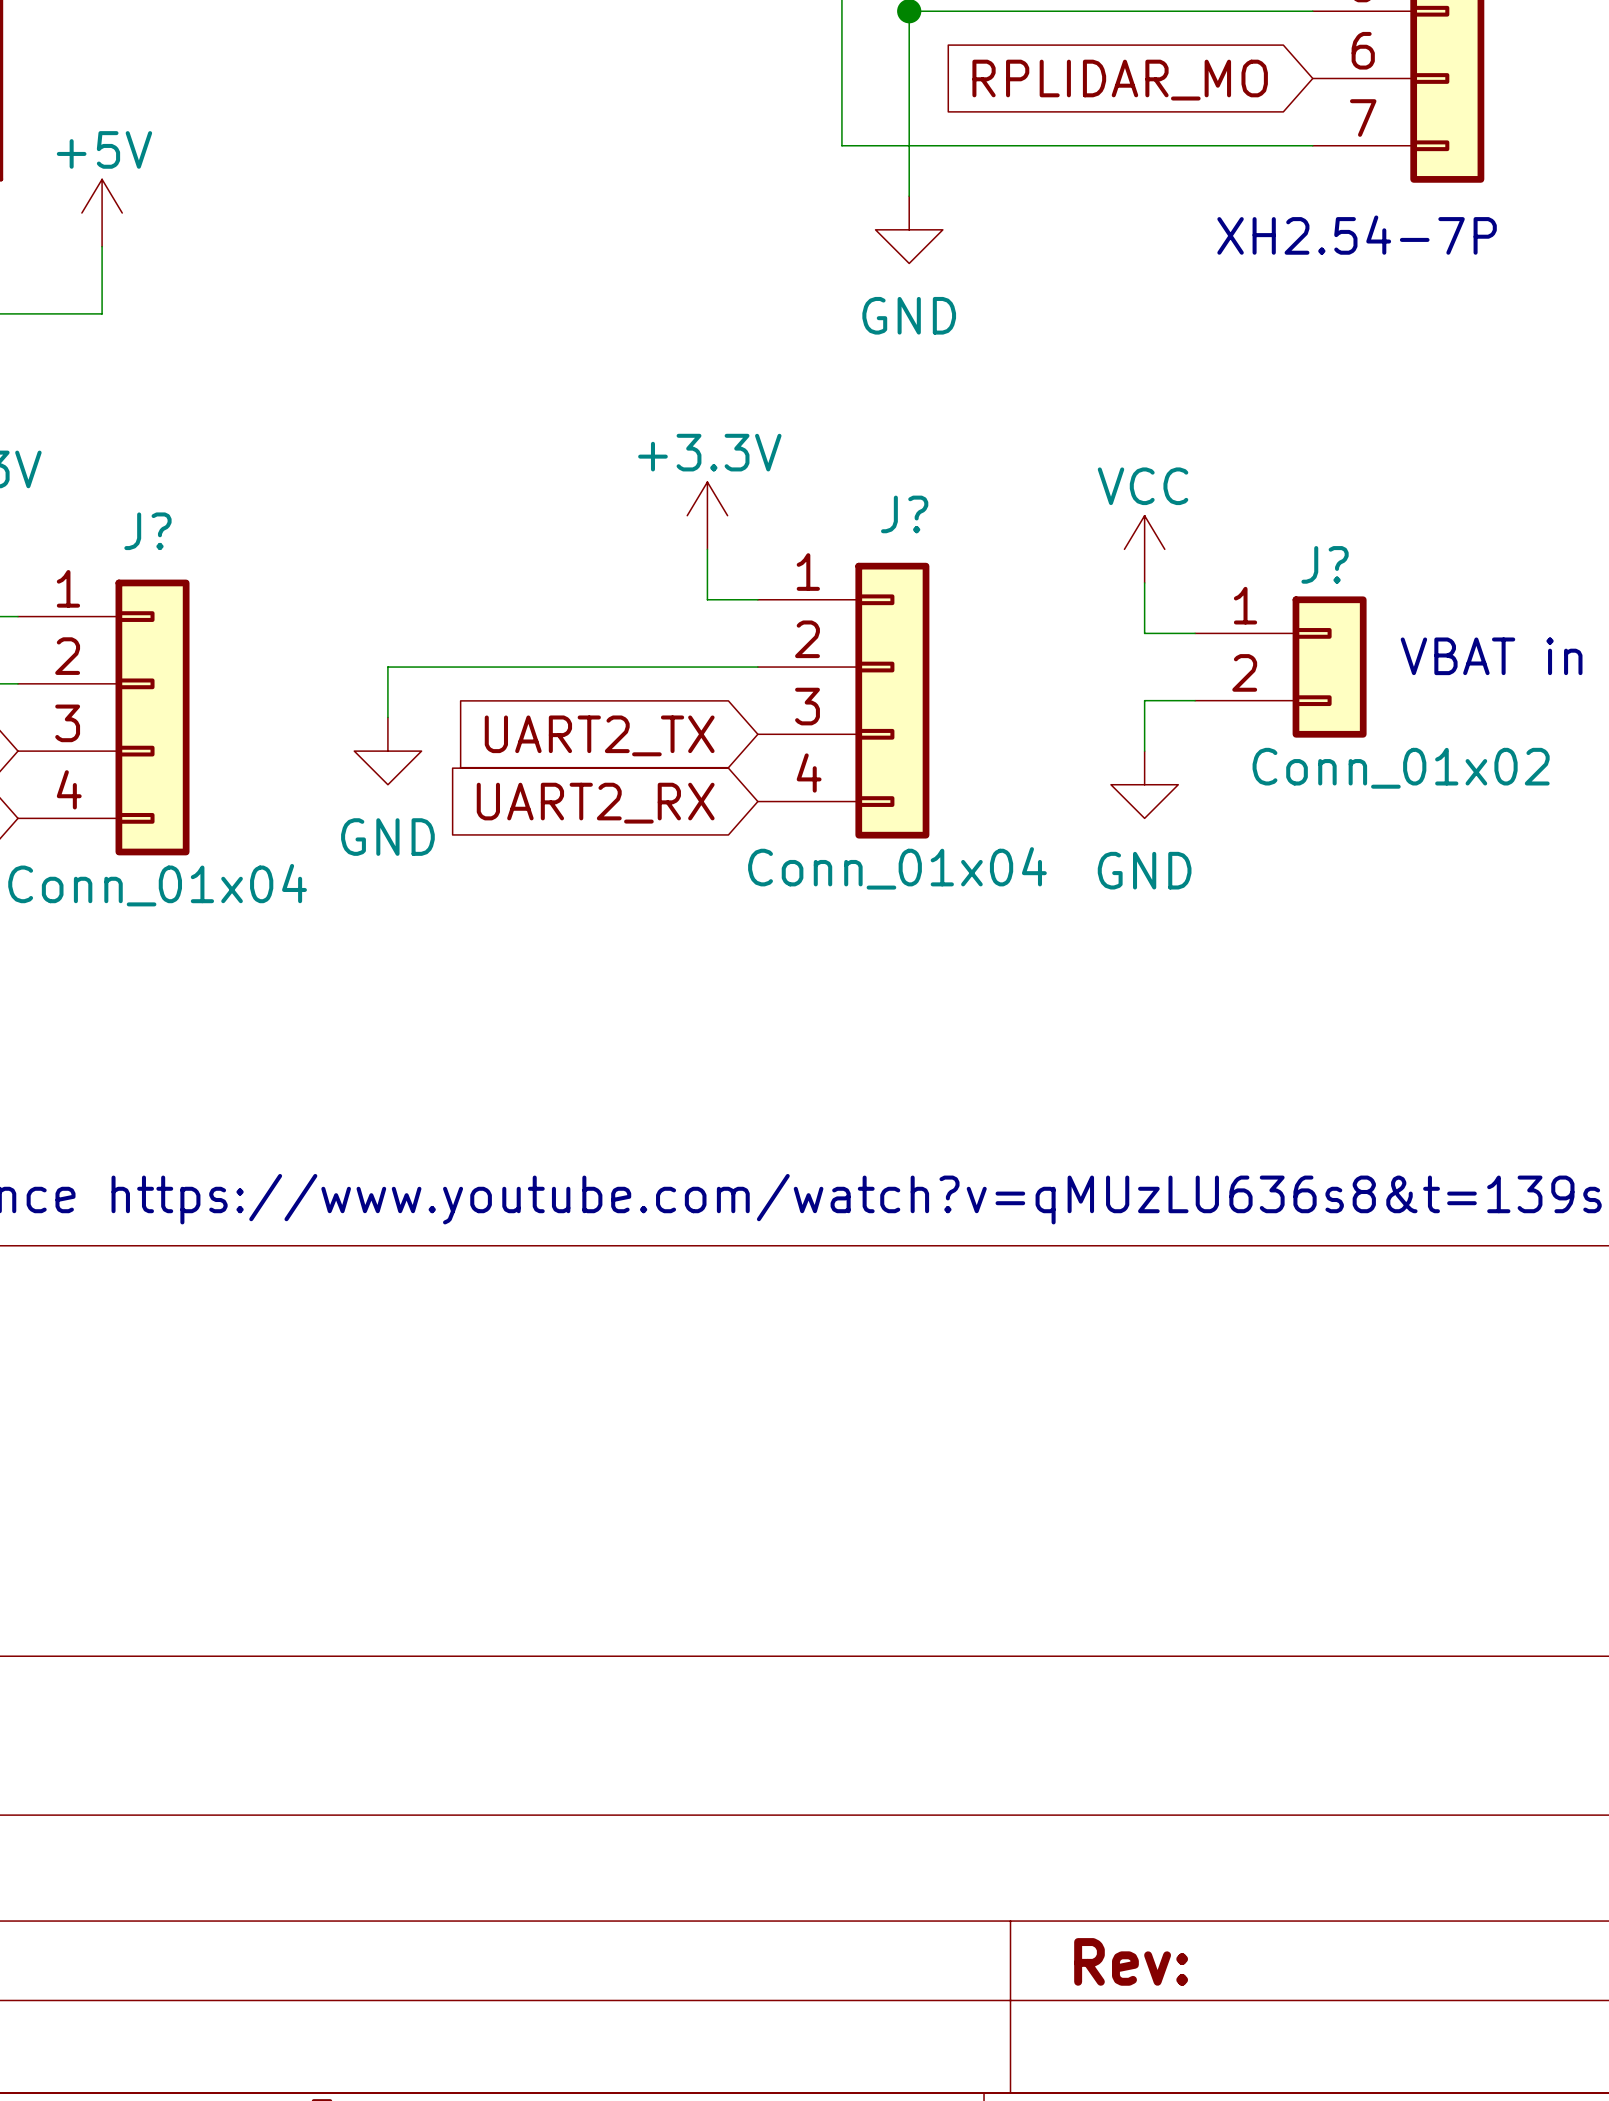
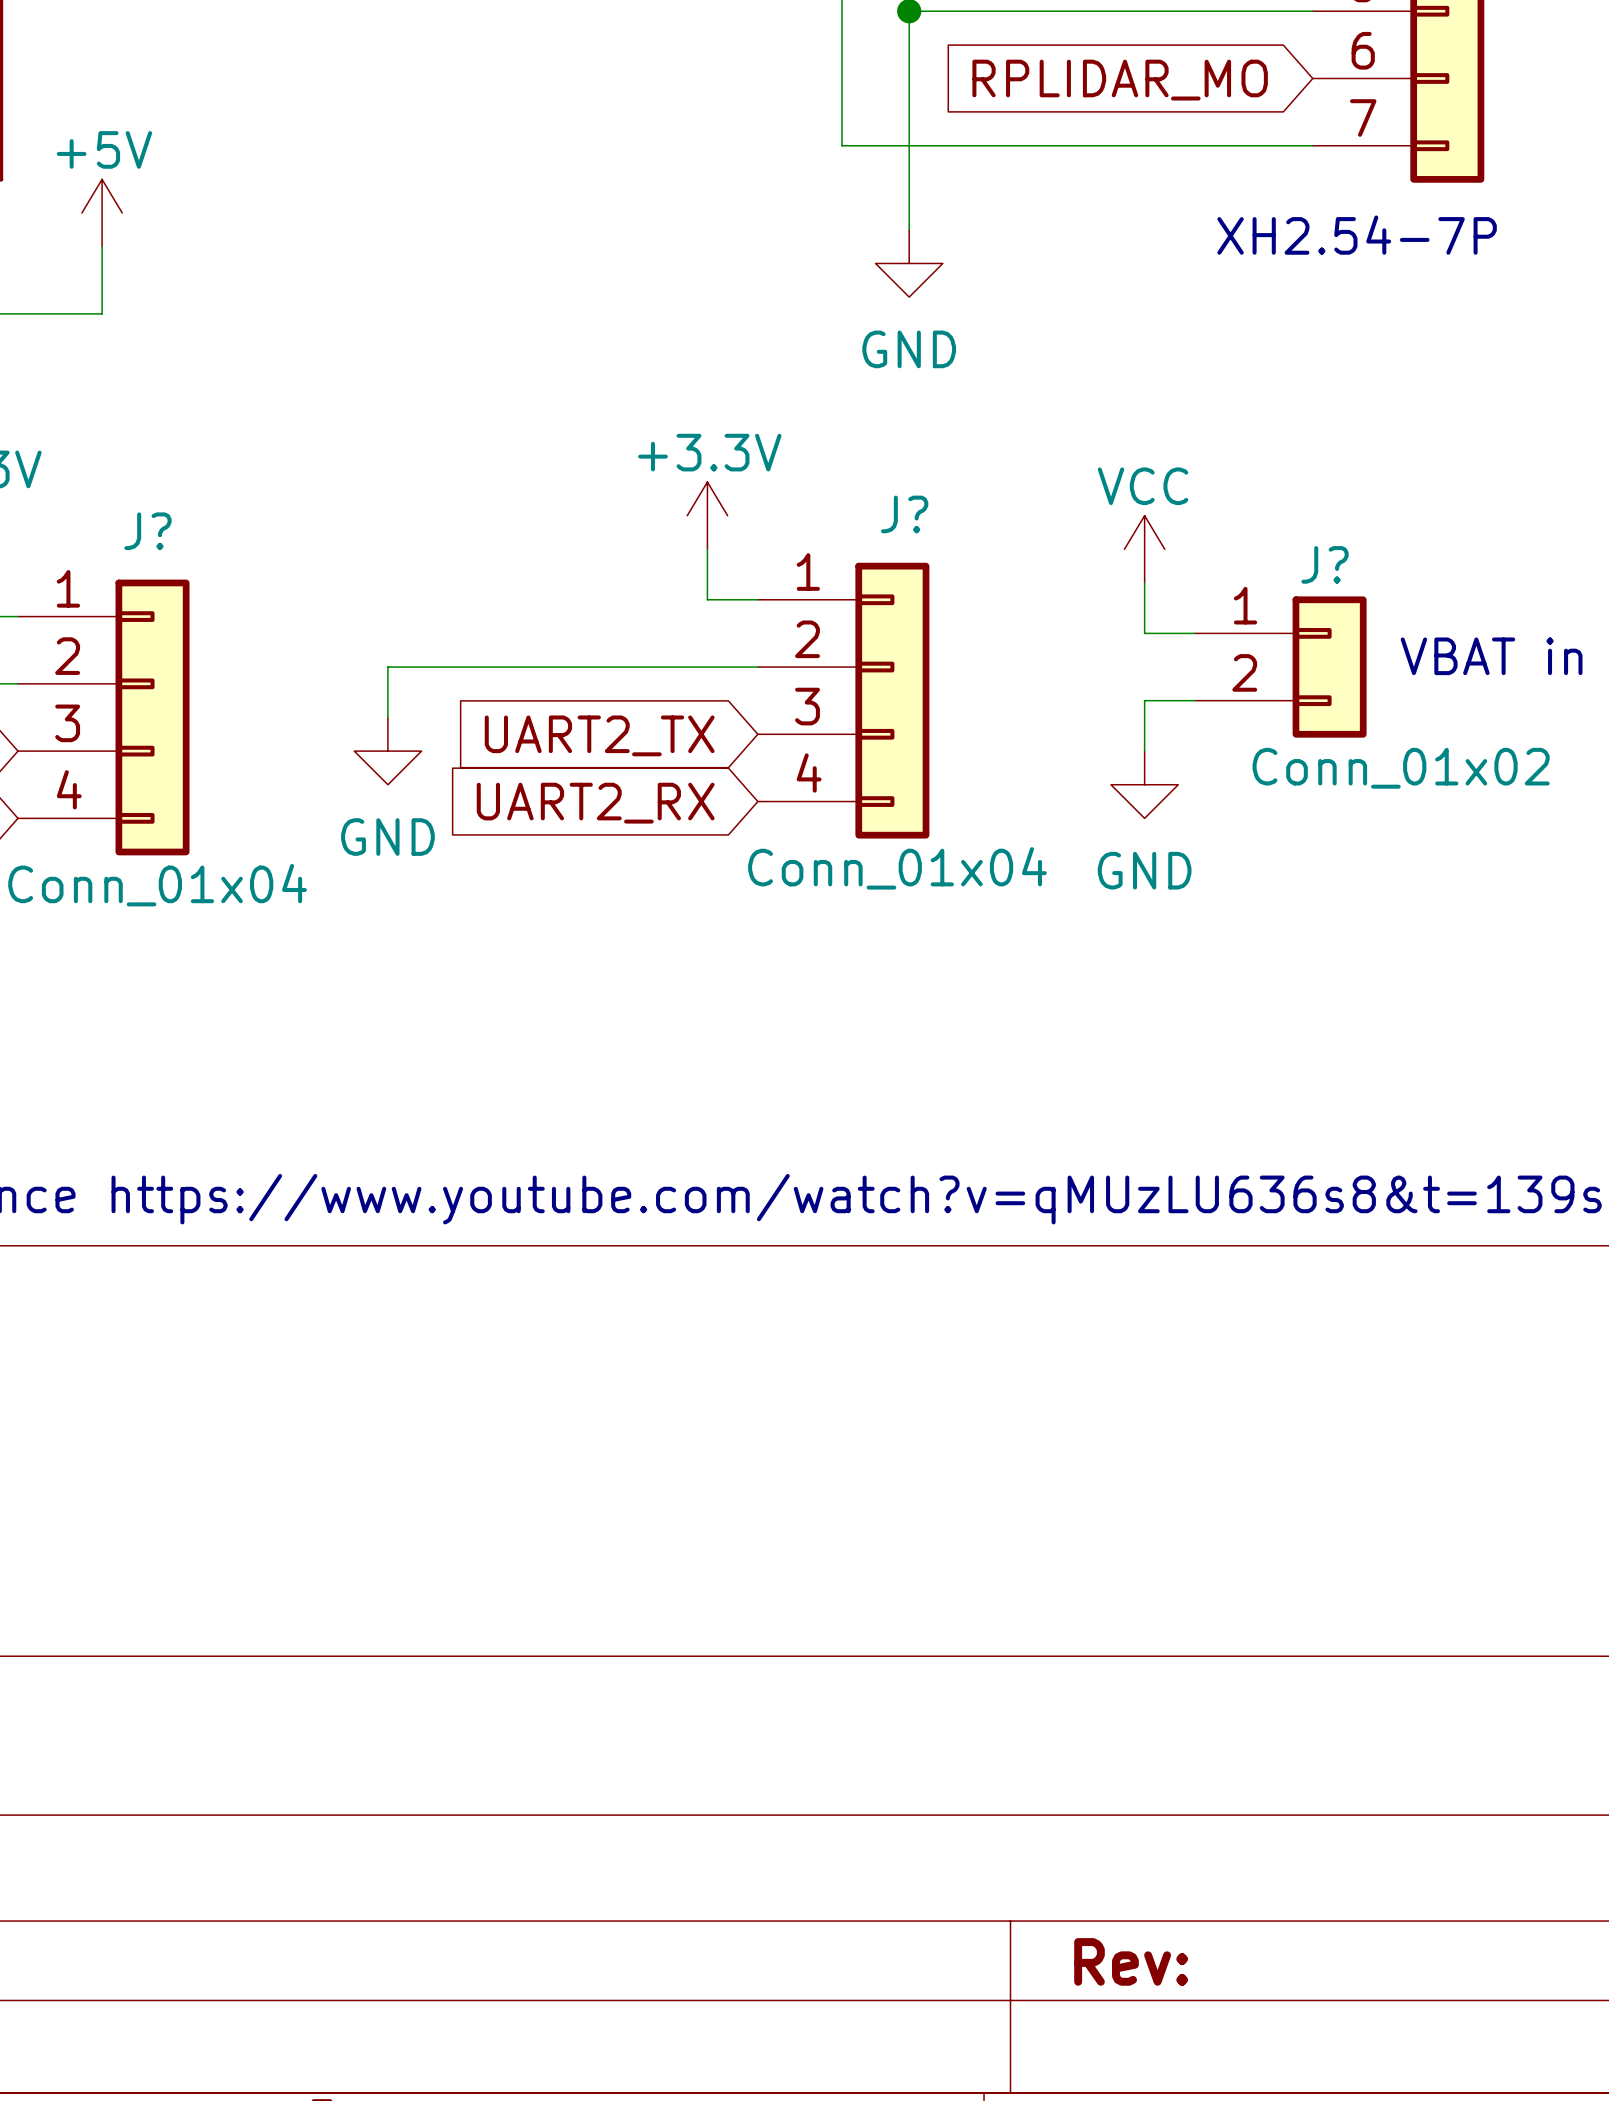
power symbol position: GND (909, 229) -> GND (909, 263)

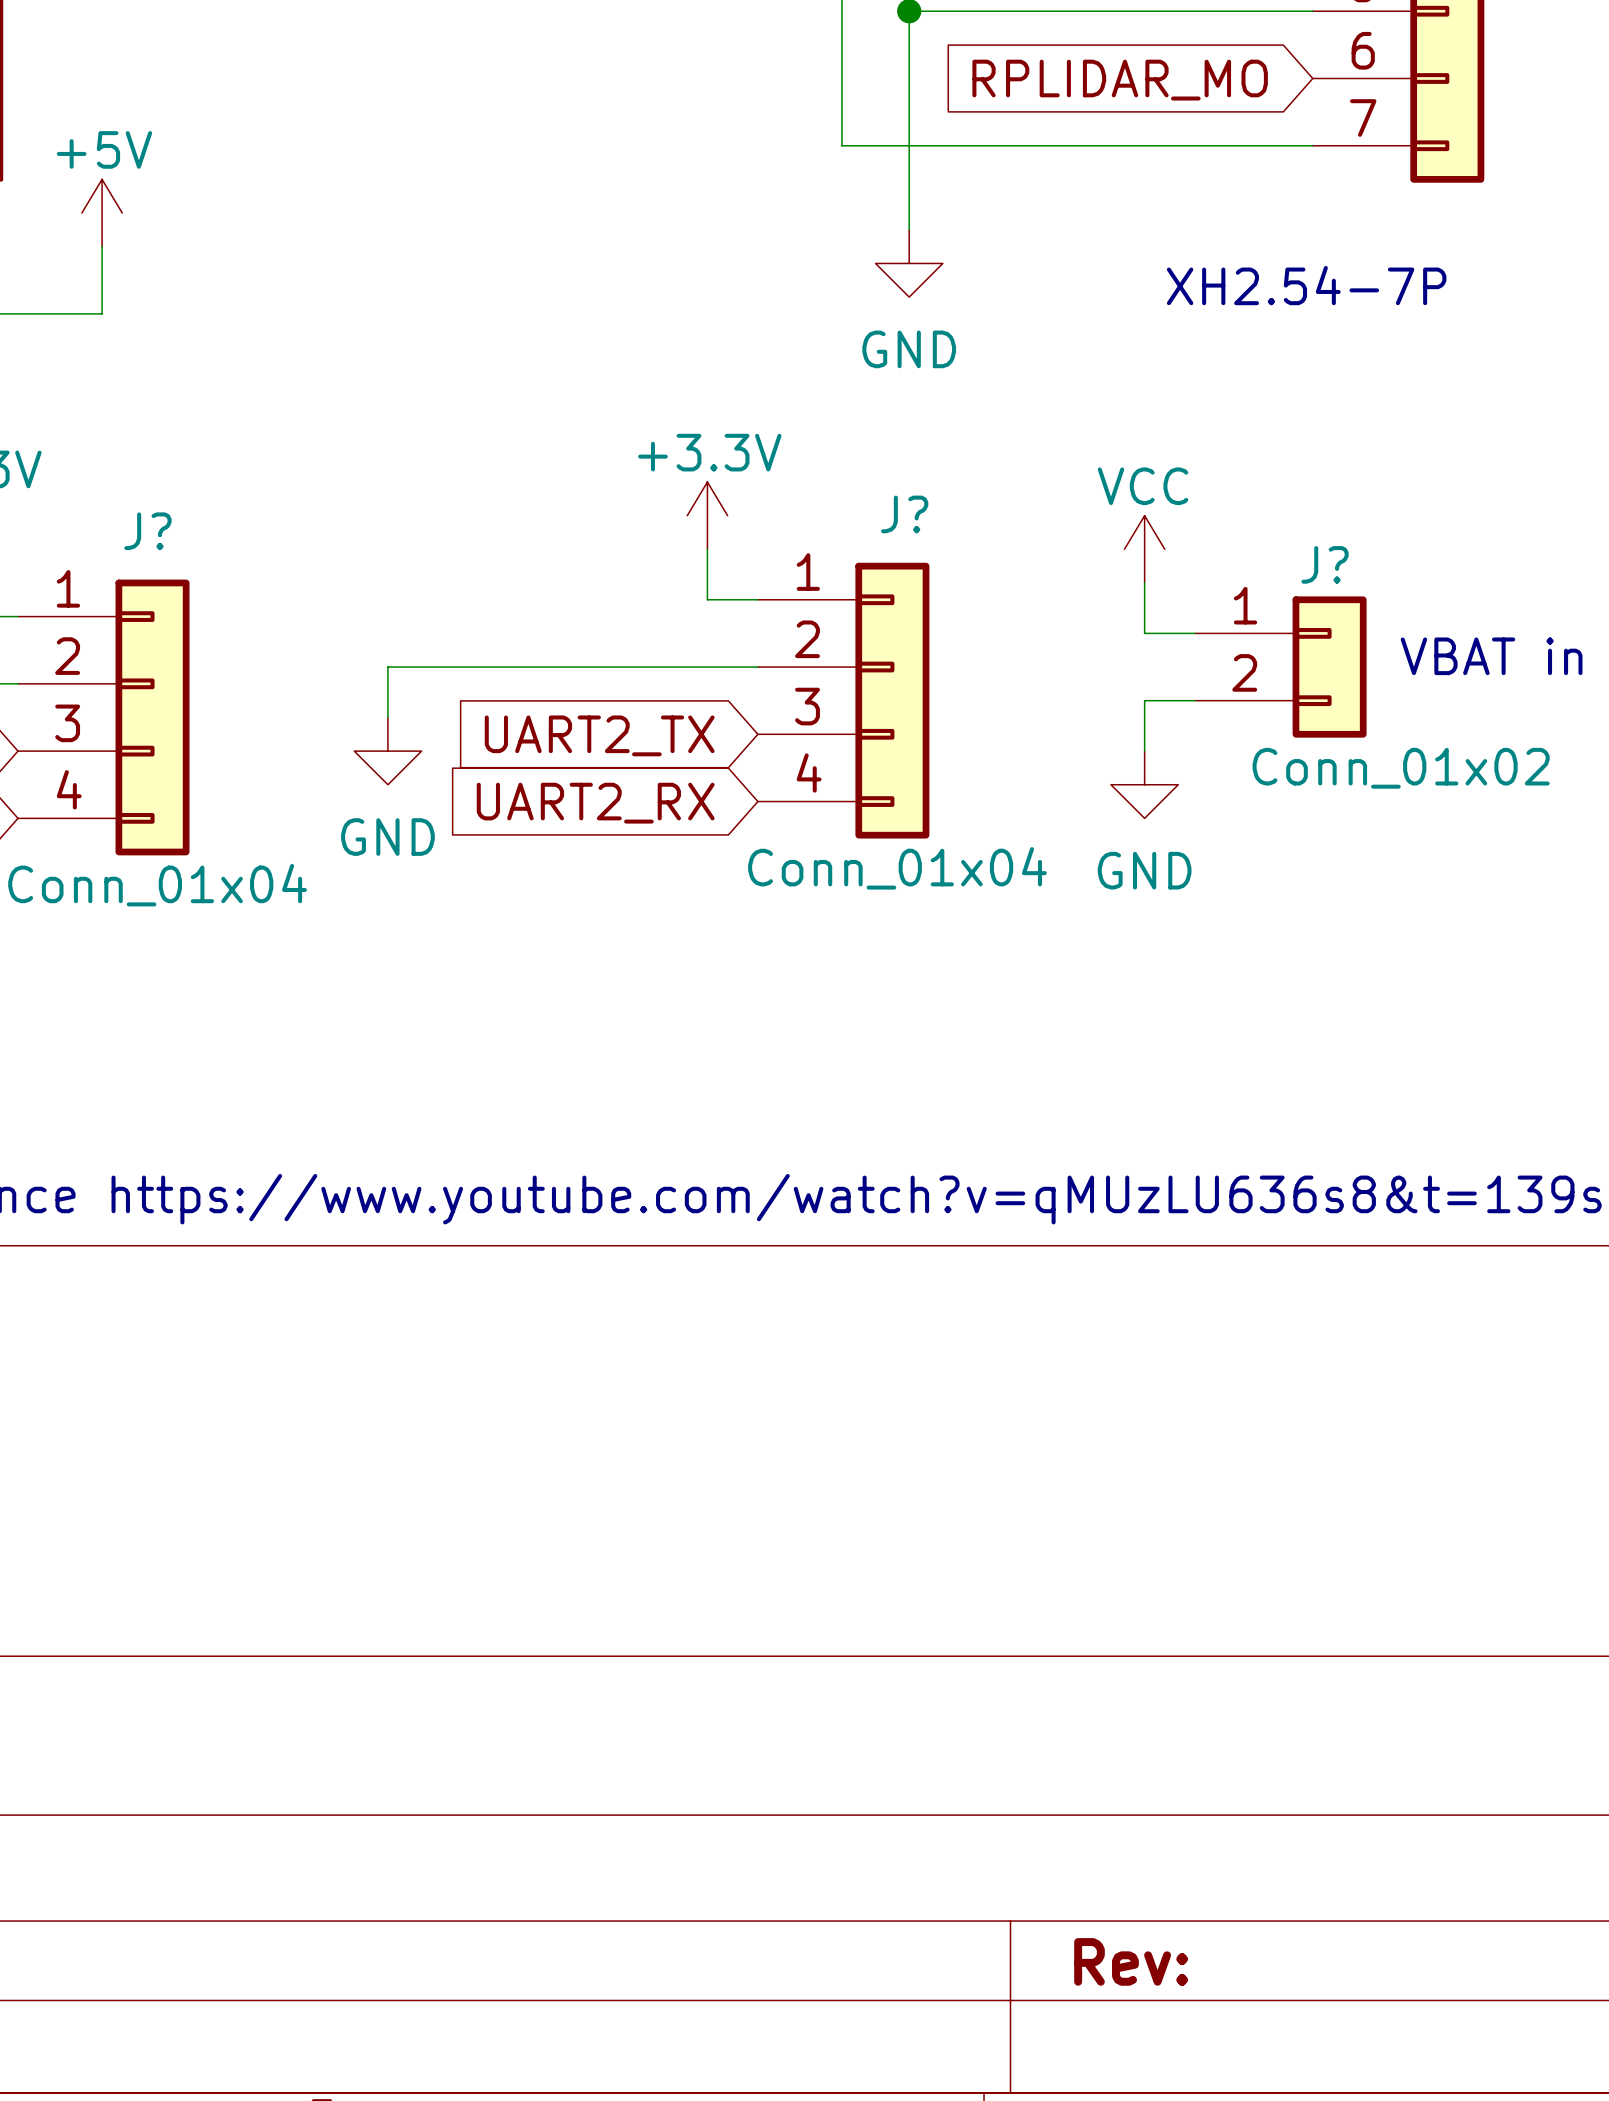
text position: XH2.54-7P (1357, 235) -> XH2.54-7P (1306, 285)

